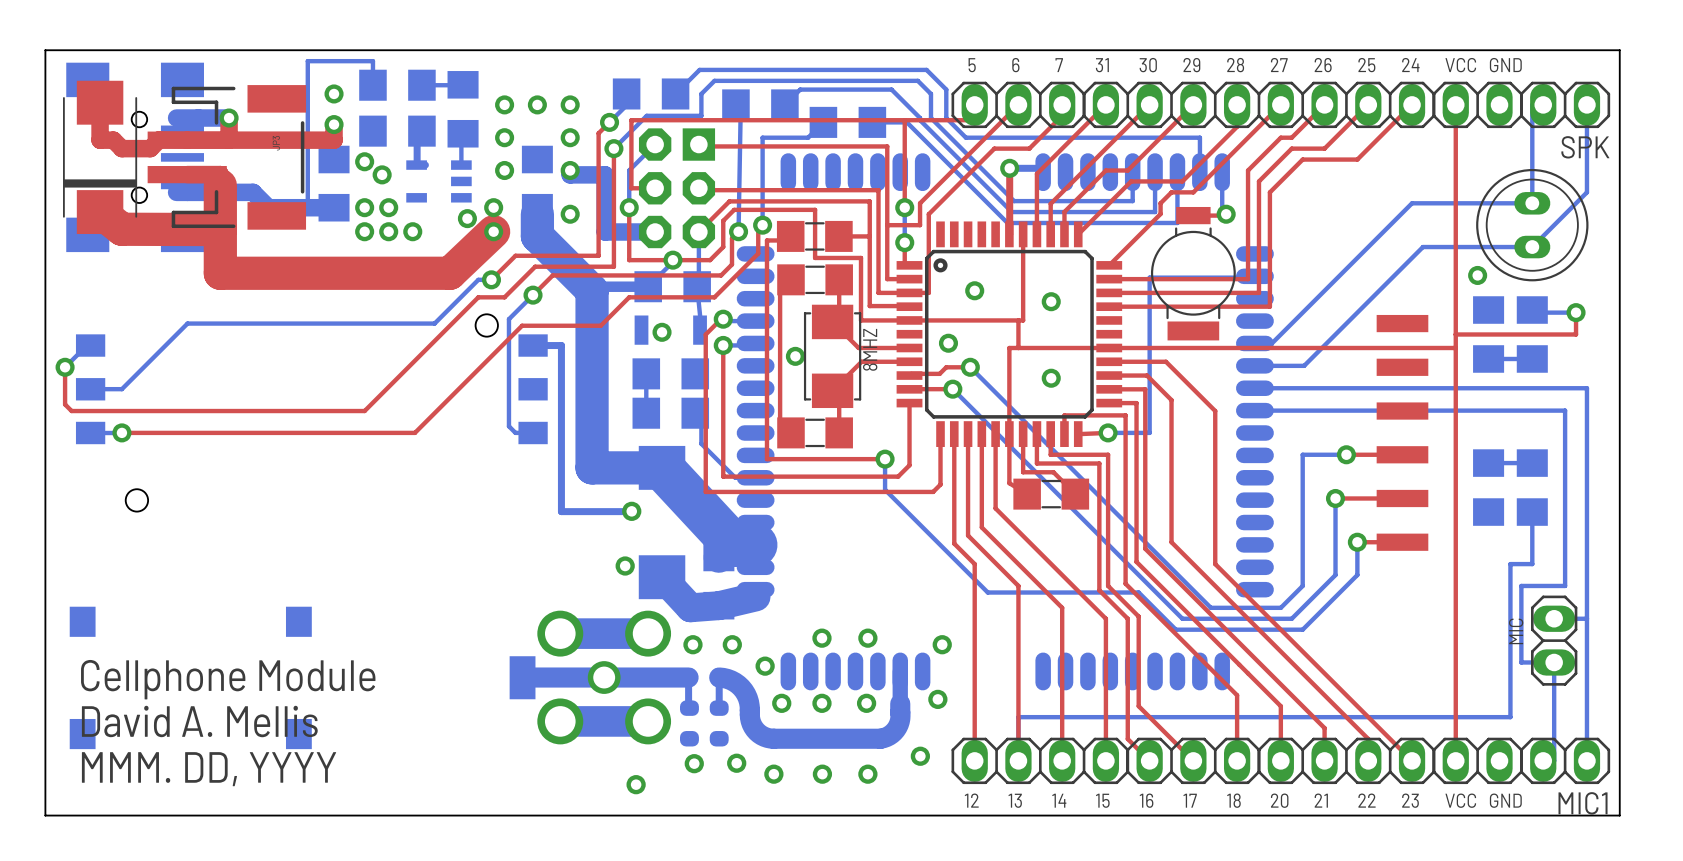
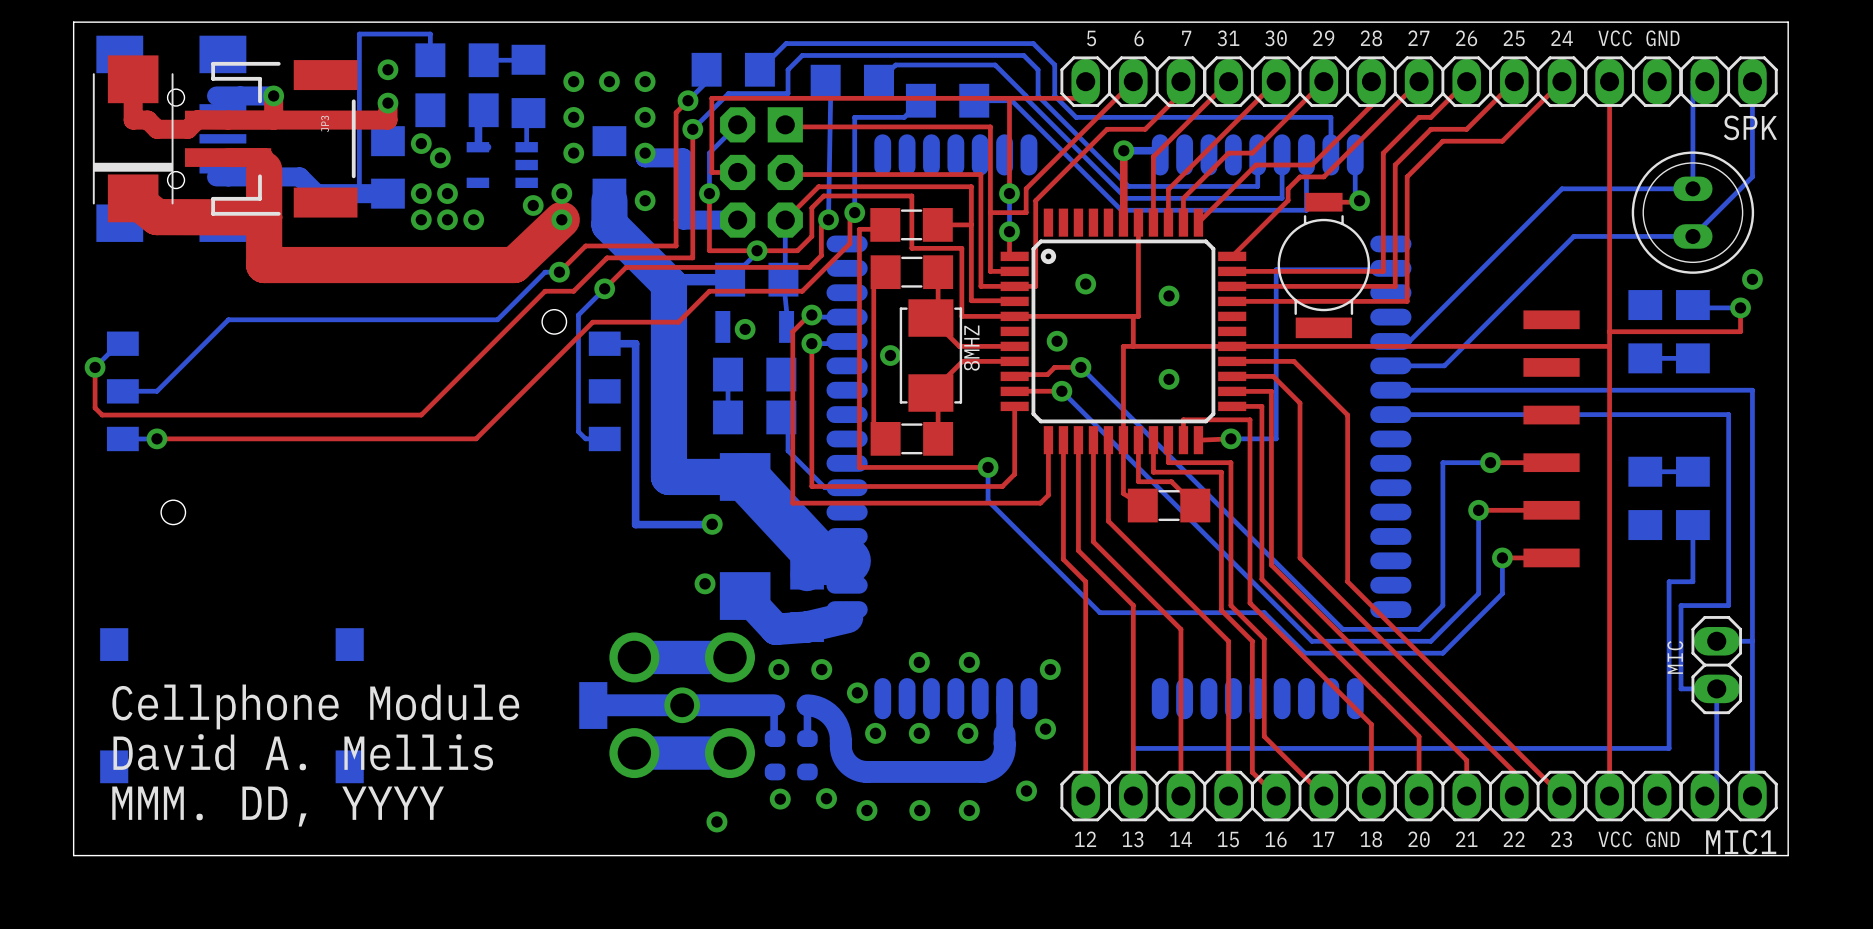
via: (1477, 275) -> none
via: none -> (1752, 279)

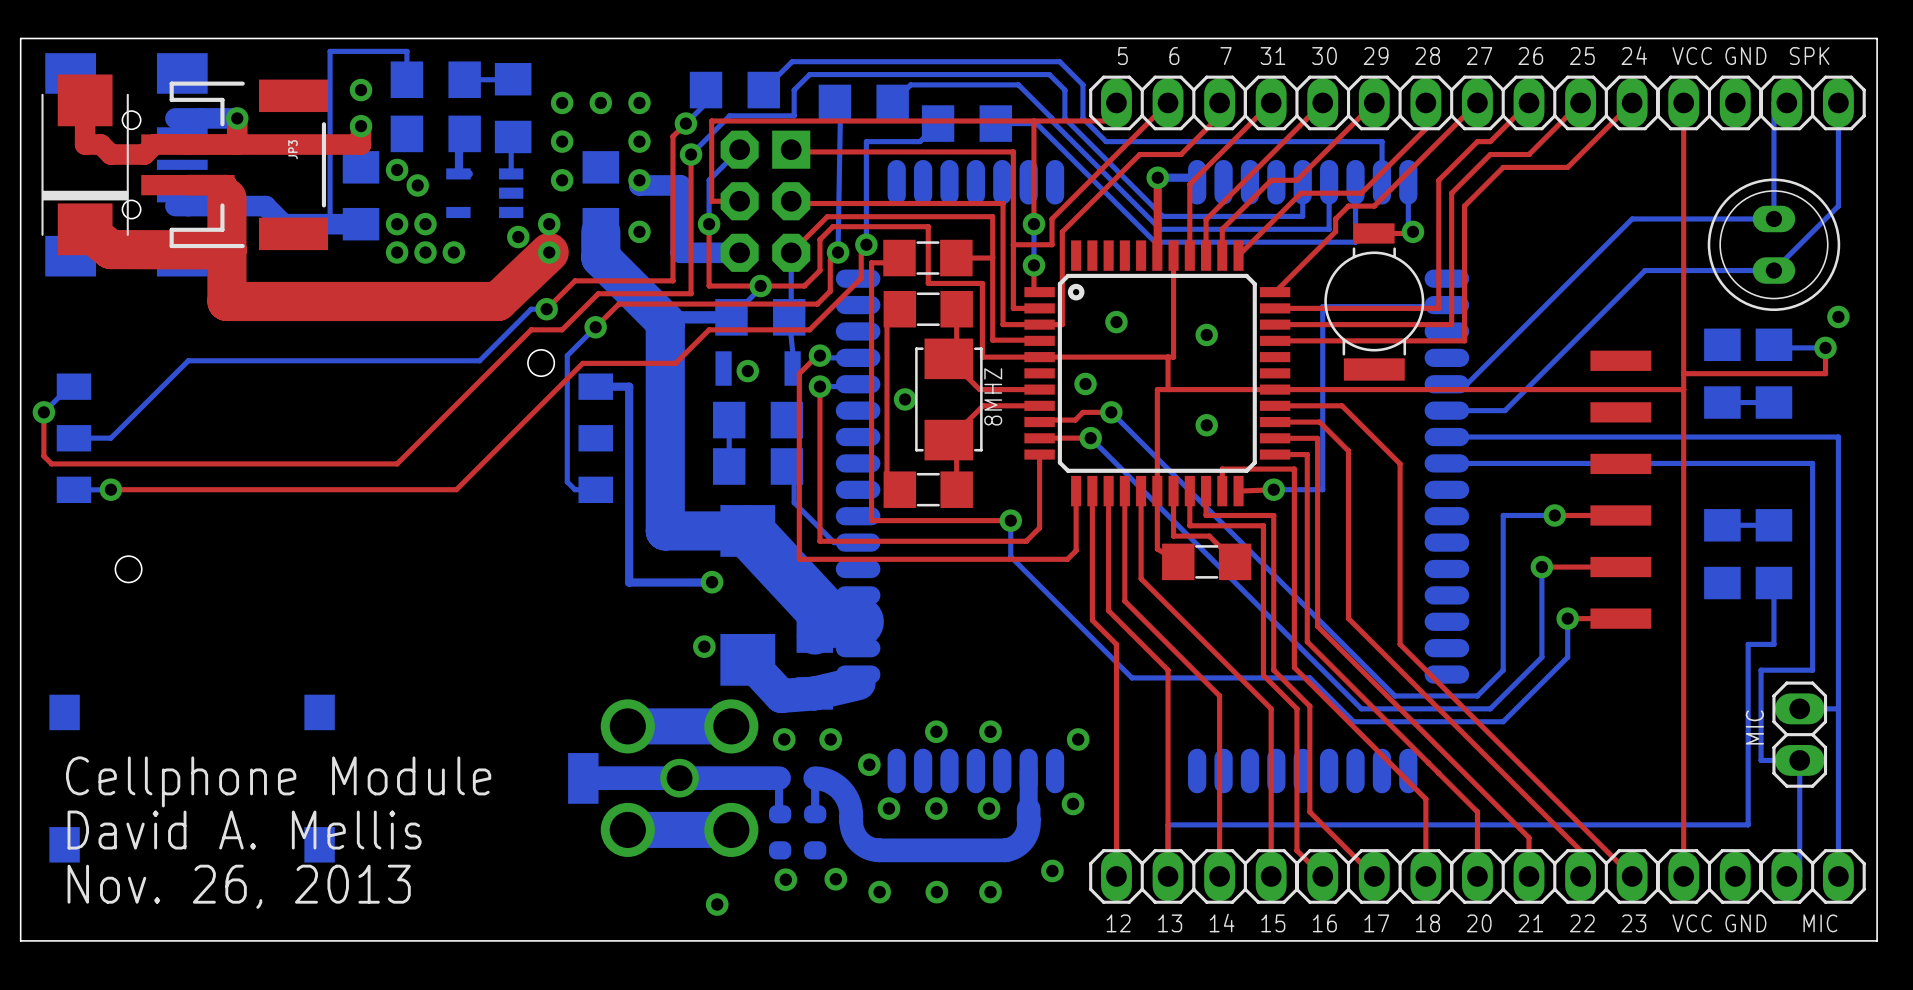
text: none -> SPK (1809, 56)
SPK name: SPK (1750, 127) -> none
text: MMM. DD, YYYY (278, 806) -> Nov. 26, 2013 (239, 886)
text: none -> MIC (1820, 923)
MIC1 name: MIC1 (1741, 842) -> none

